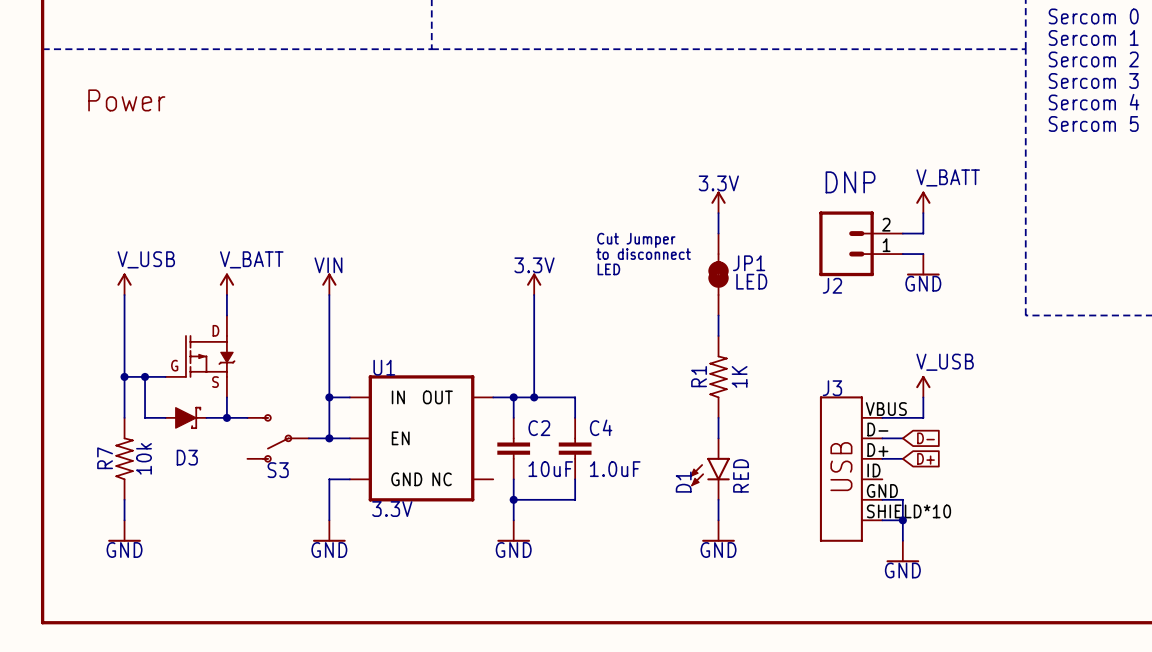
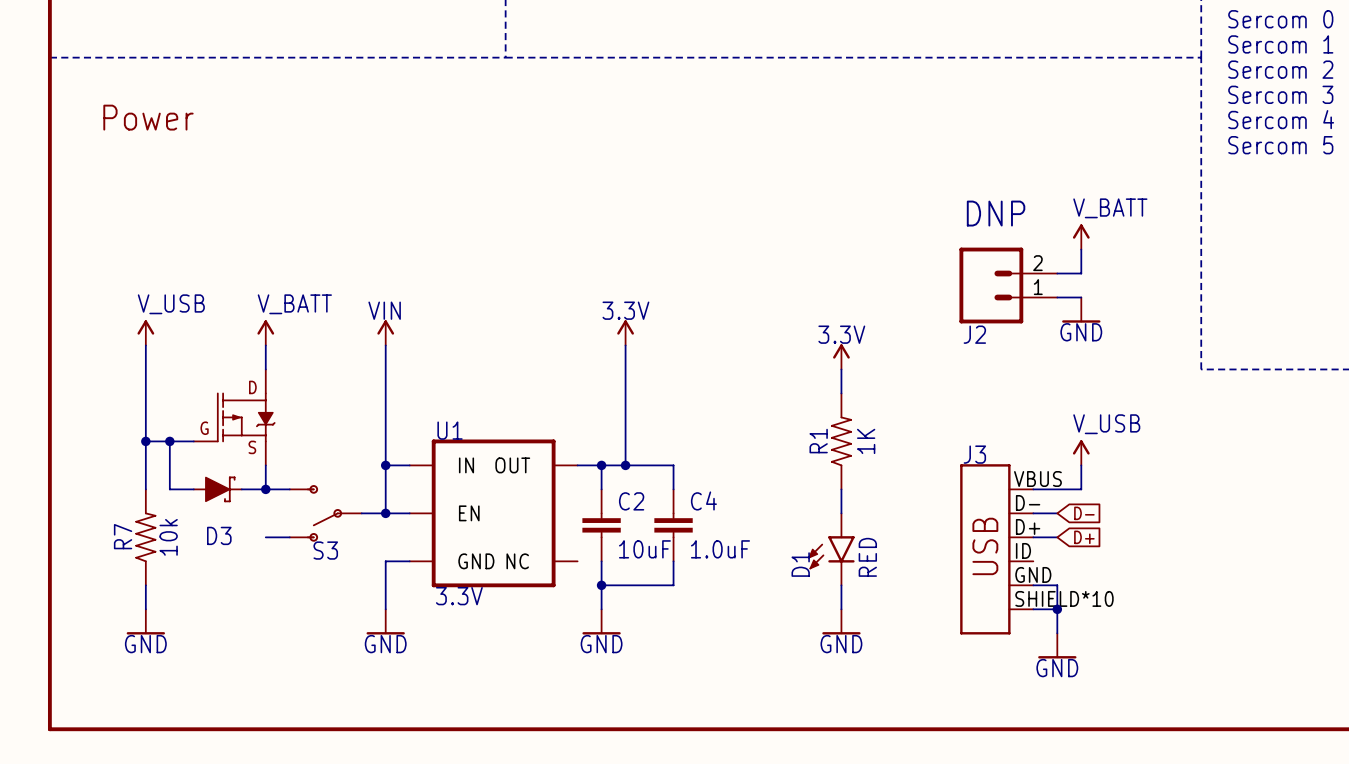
power symbol position: 3.3V (718, 202) -> 3.3V (841, 356)
wire: (718, 213) (718, 233) -> none
text: Cut Jumper (636, 240) -> none
text: to disconnect (643, 254) -> none
text: LED (608, 269) -> none
JP1: LED (718, 274) -> none
wire: none -> (265, 537) (289, 537)

